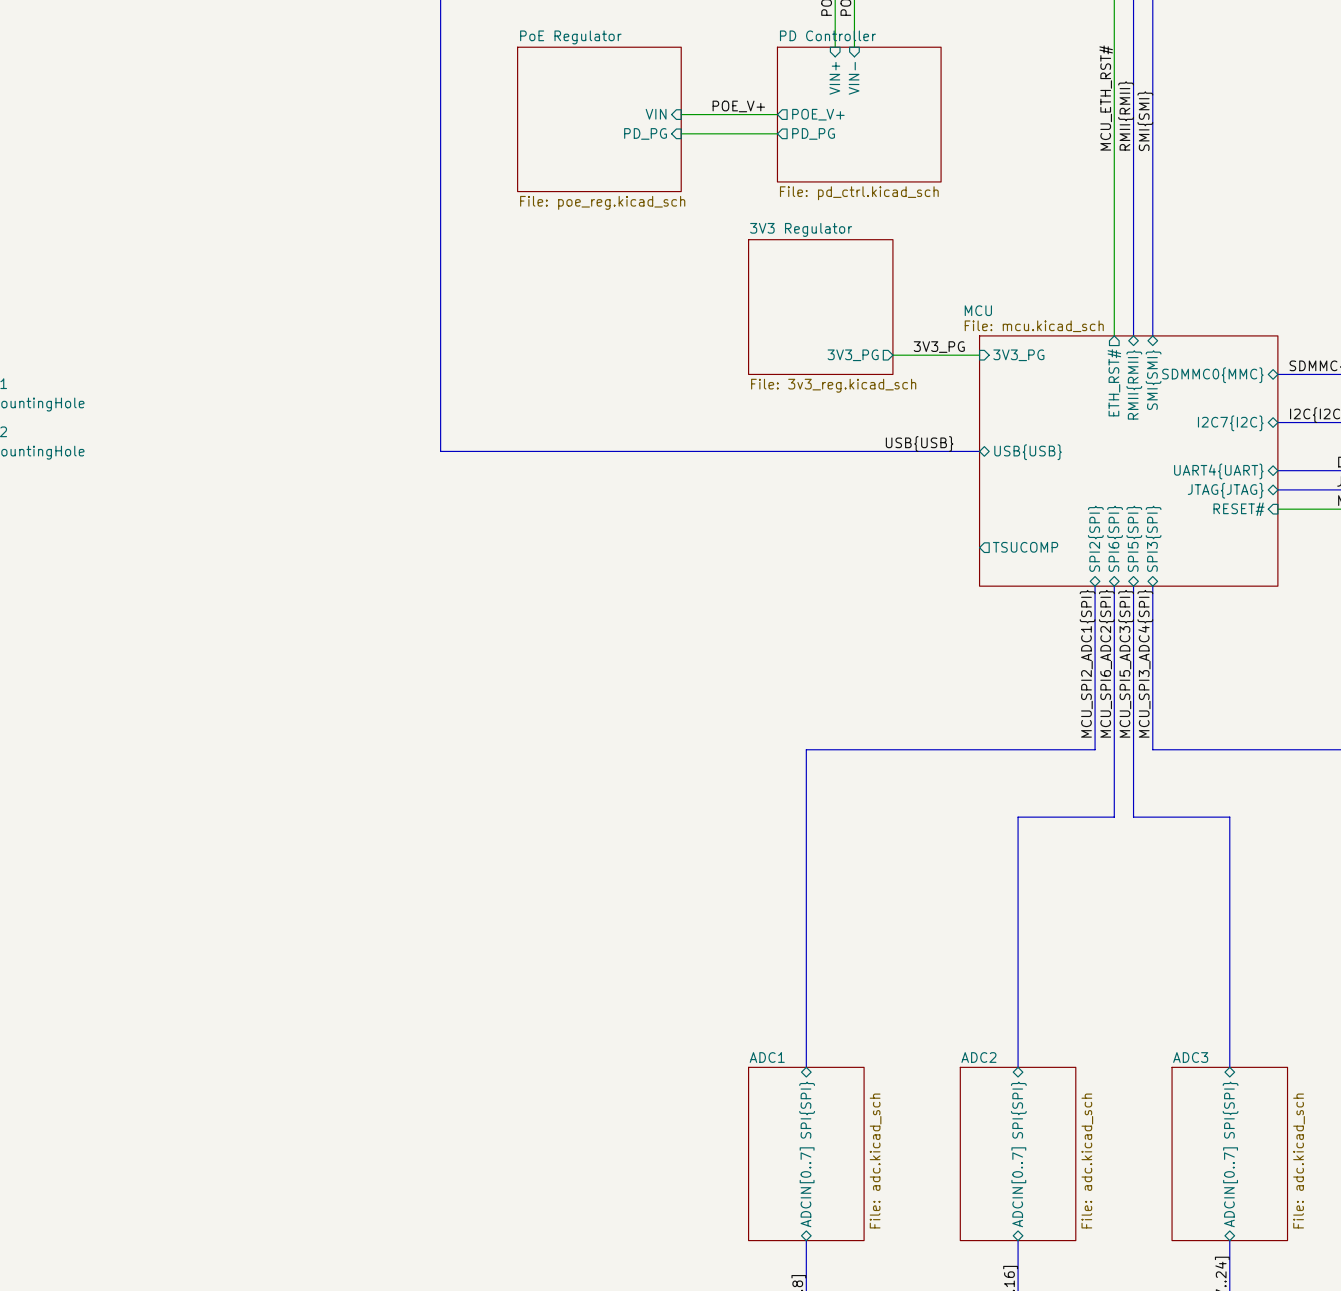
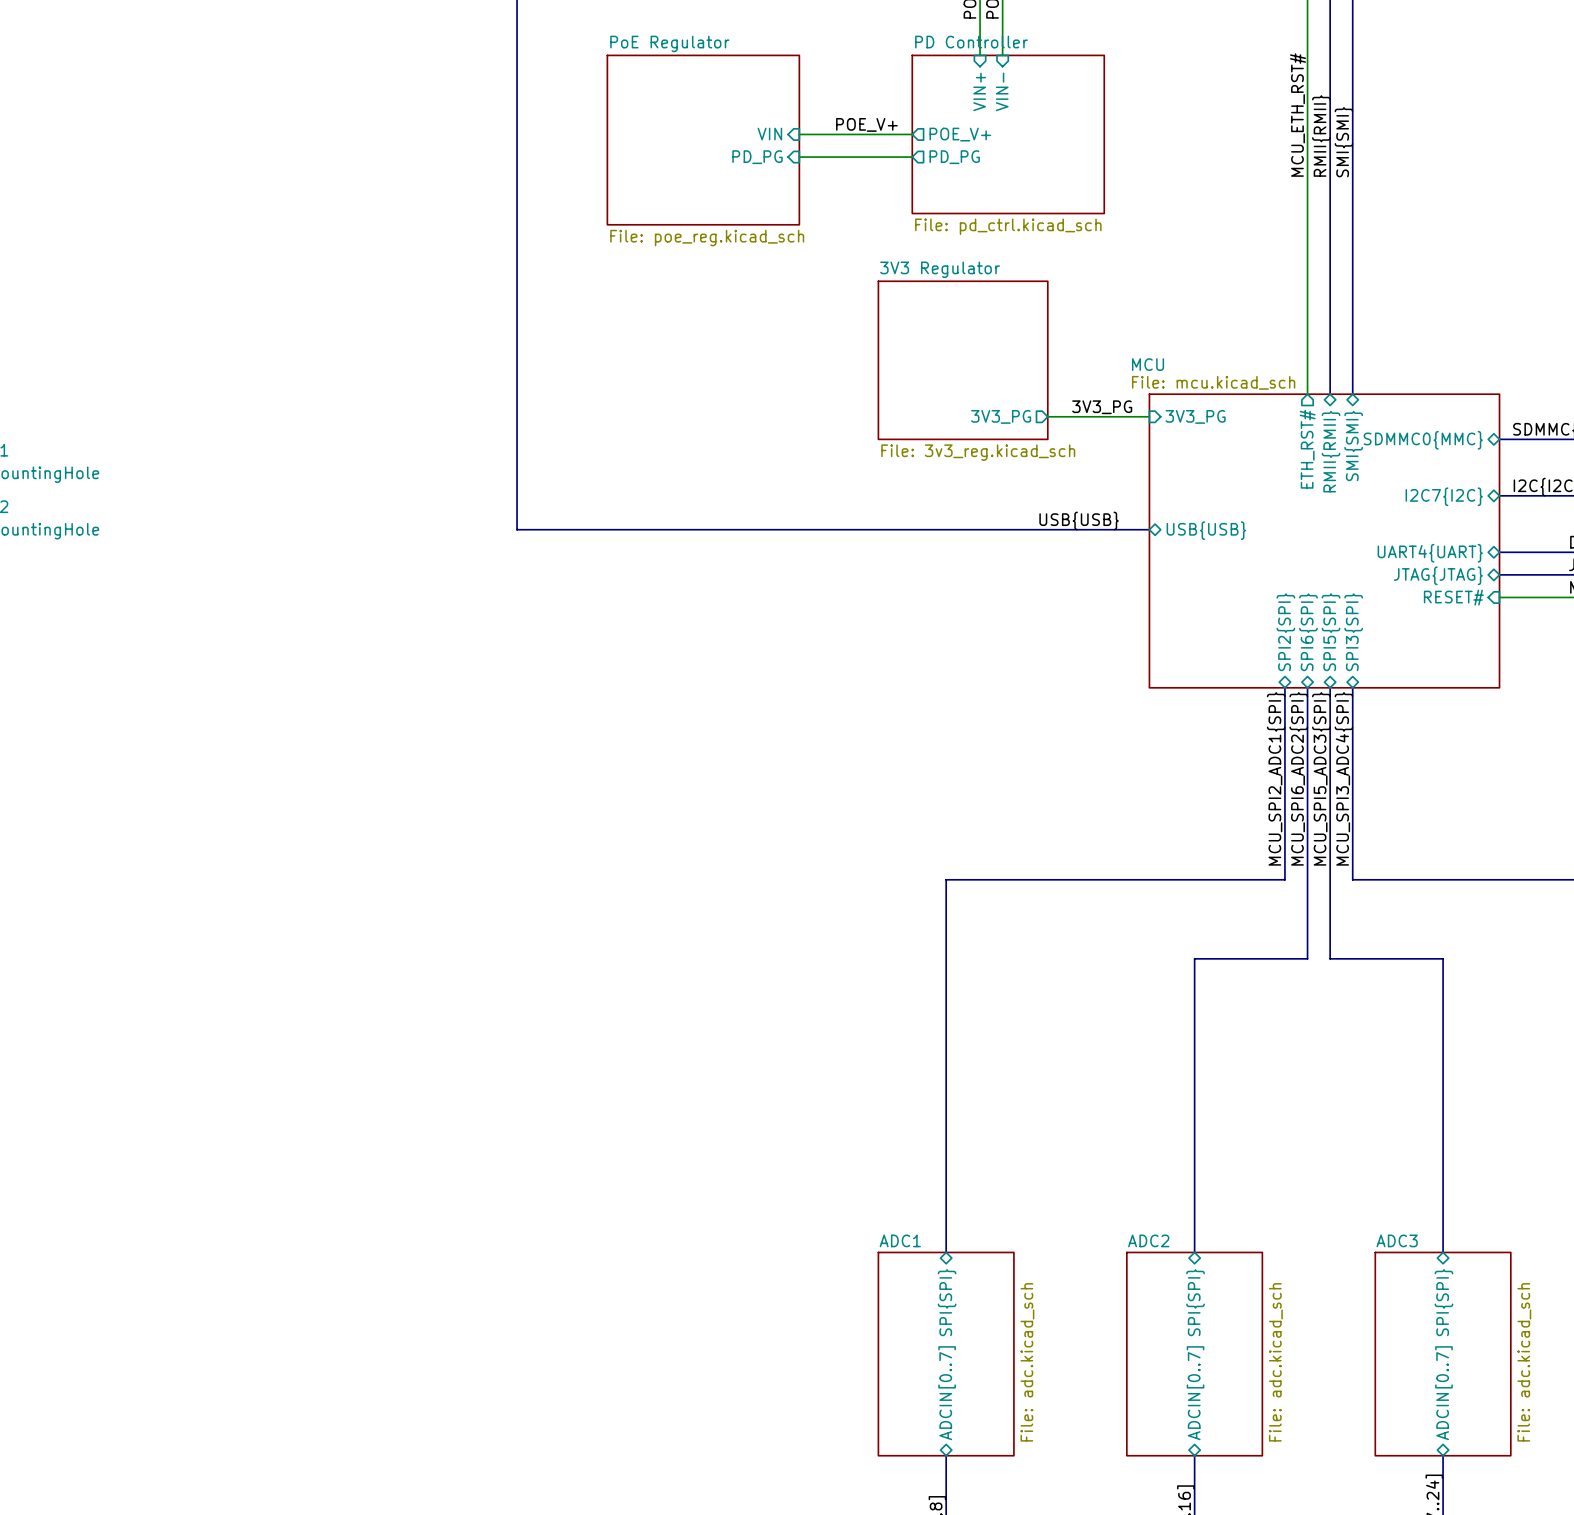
sheet pin: TSUCOMP (1025, 547) -> none

